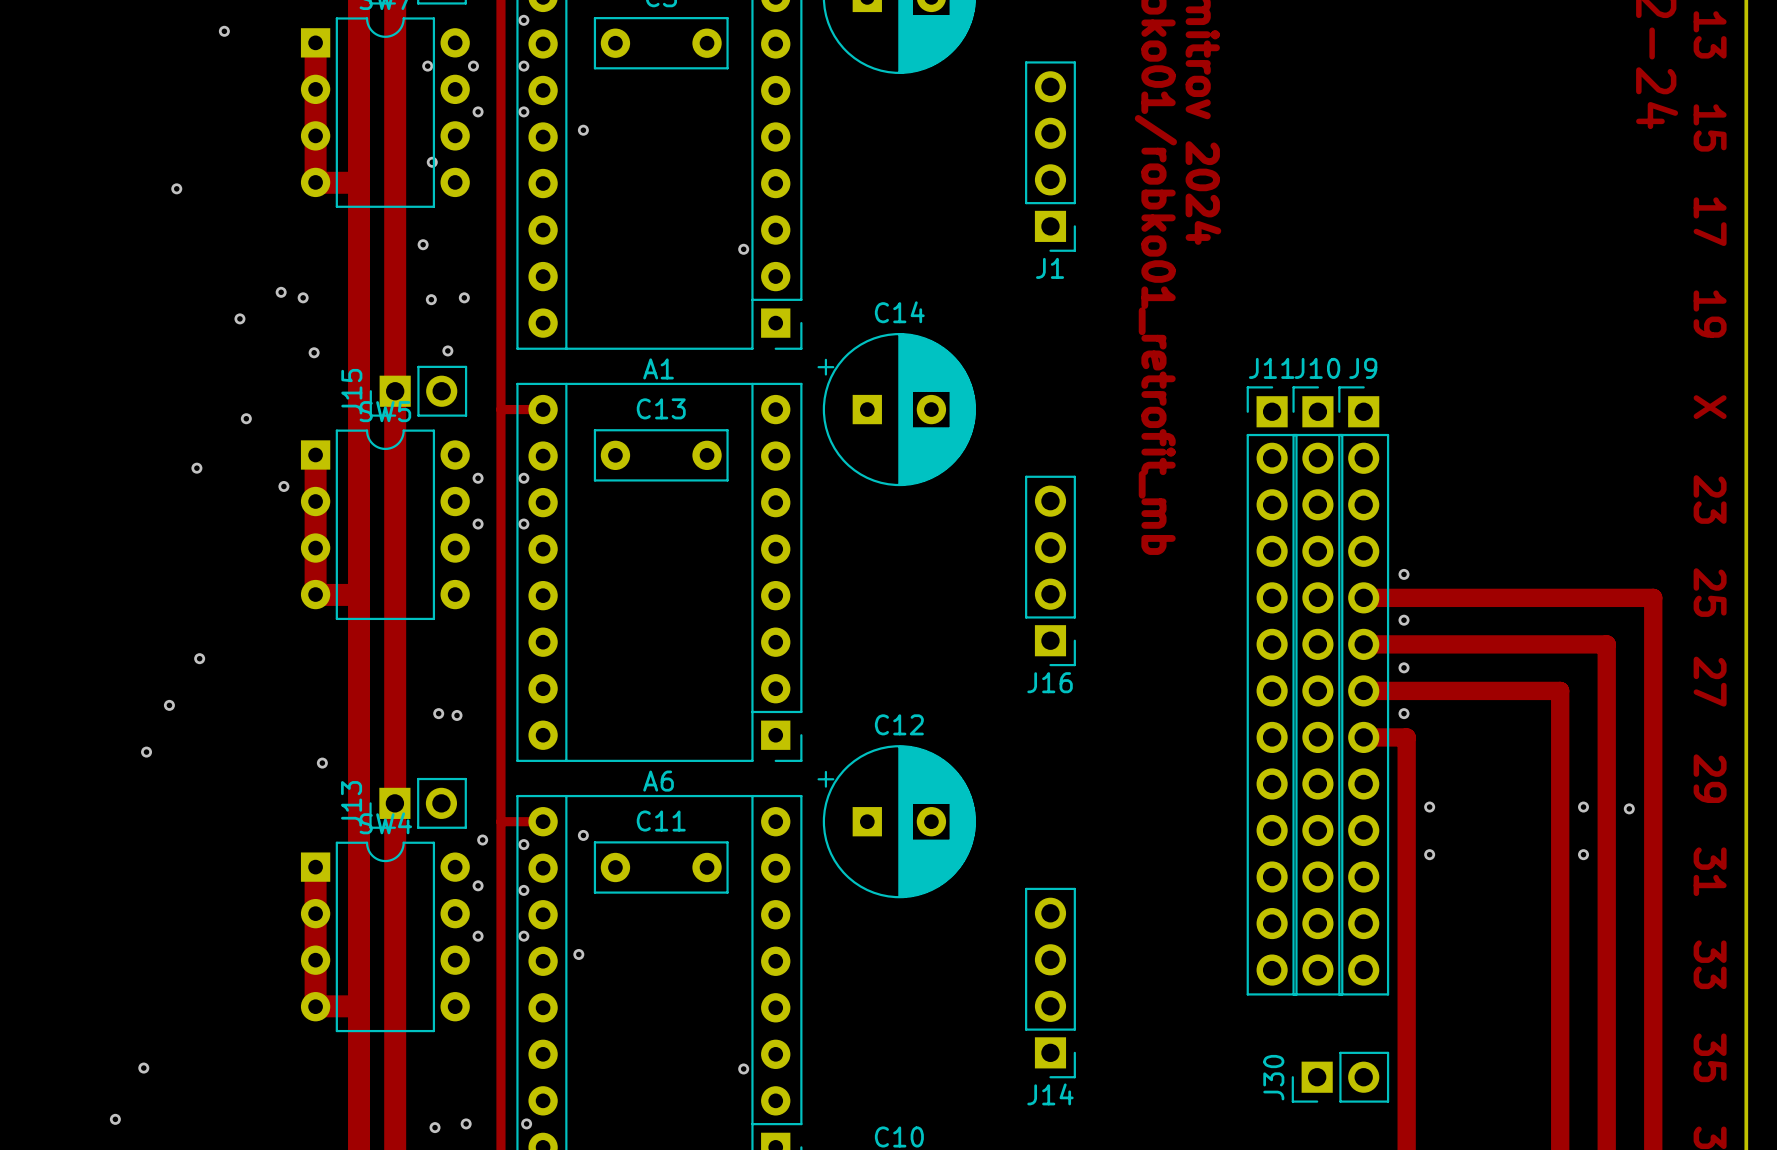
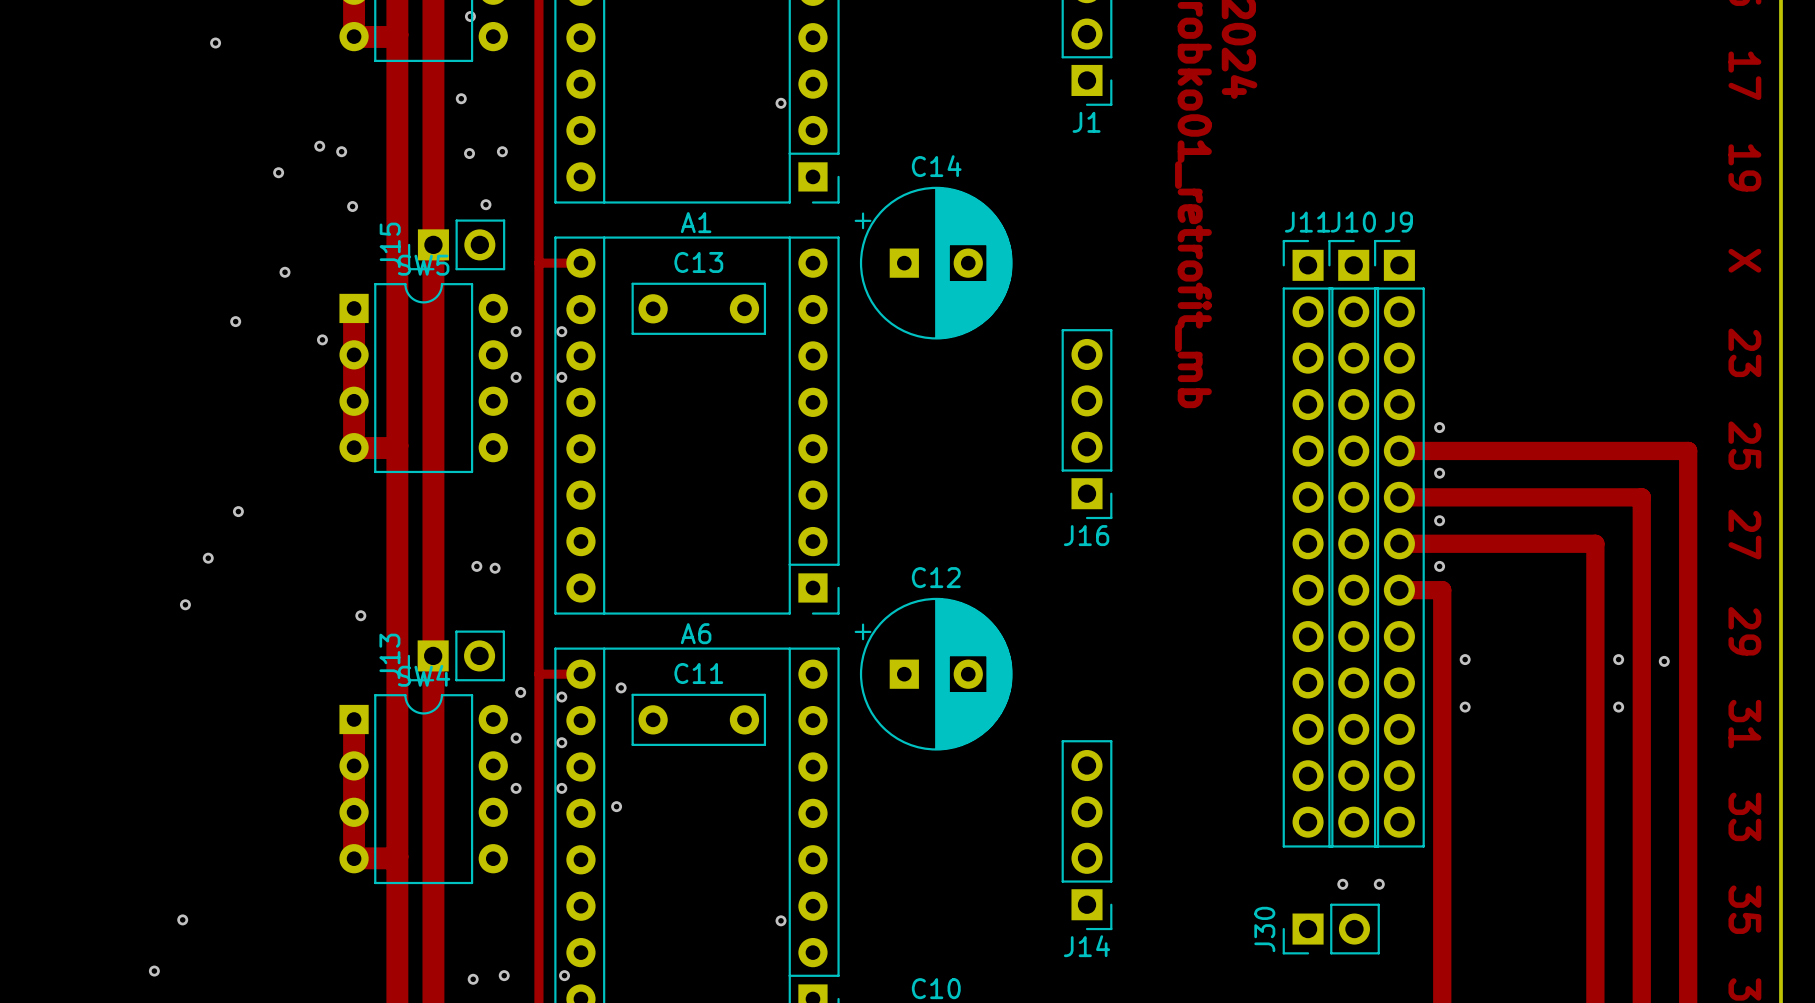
via: none -> (1342, 884)
via: none -> (1379, 884)
J30 position: (1340, 1077) -> (1331, 929)

